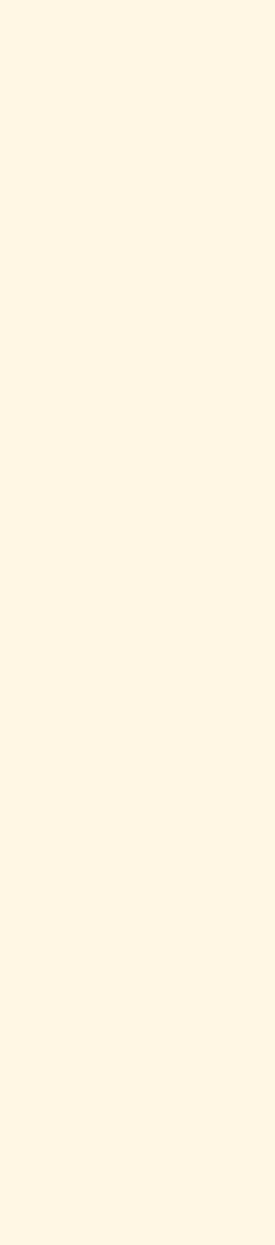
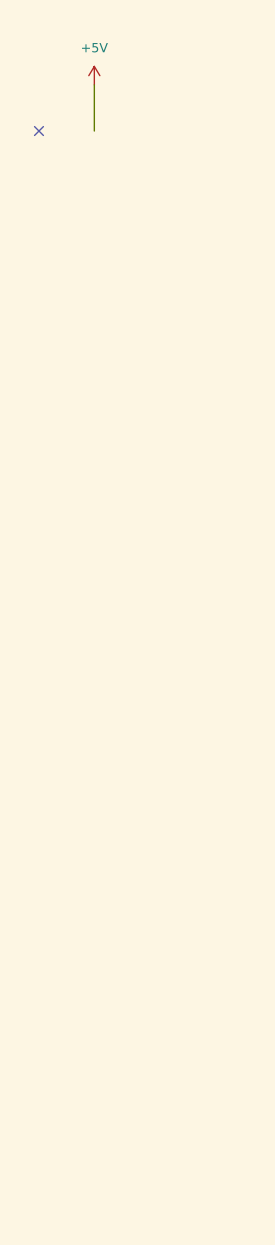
power symbol: none -> +5V (94, 75)
wire: none -> (94, 84) (94, 131)
no-connect mark: none -> (38, 131)

